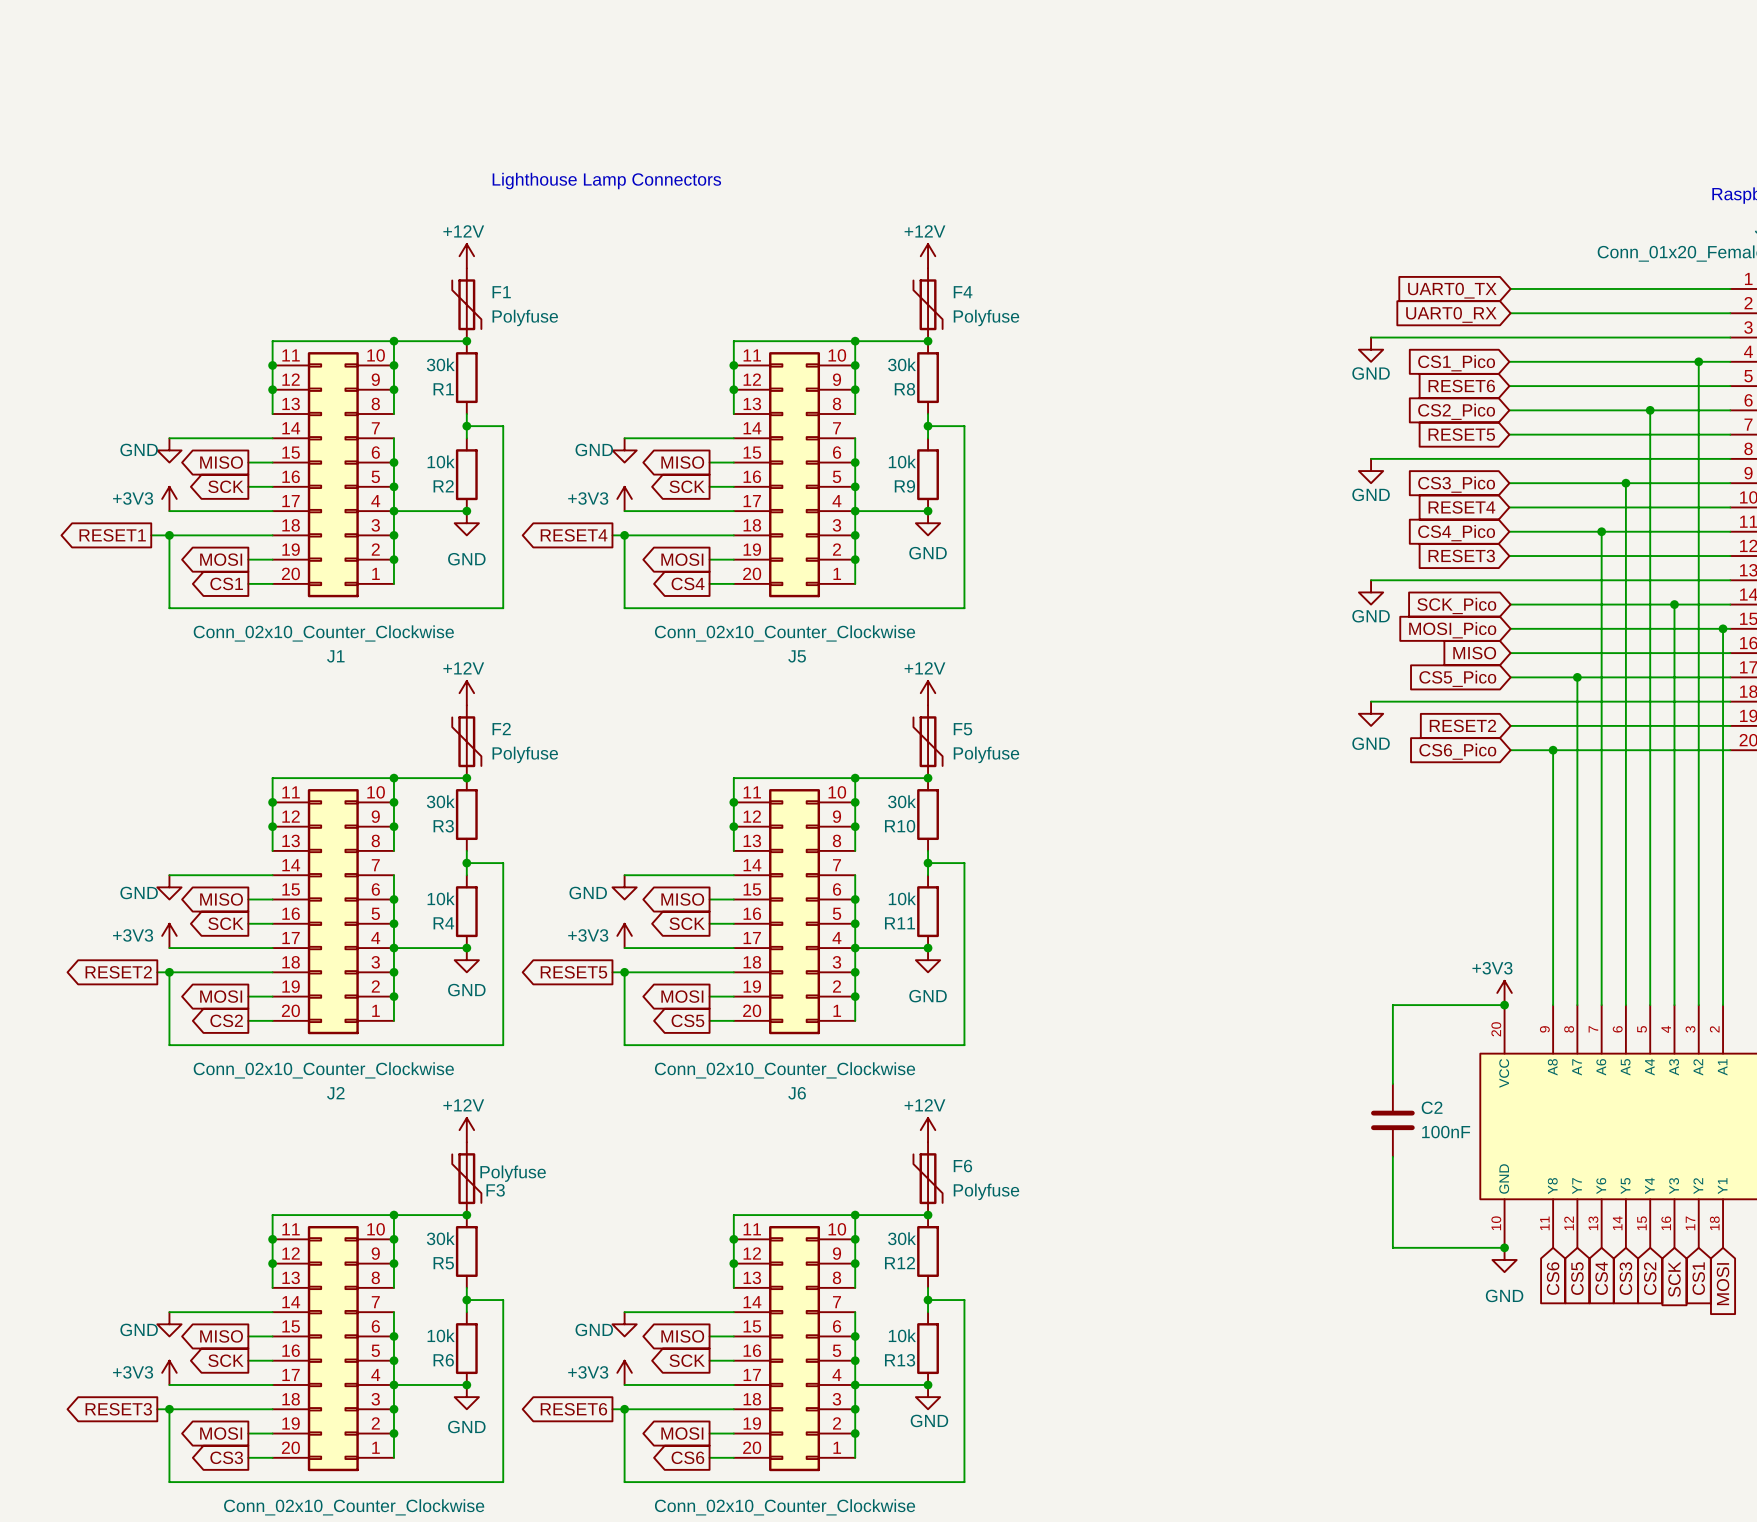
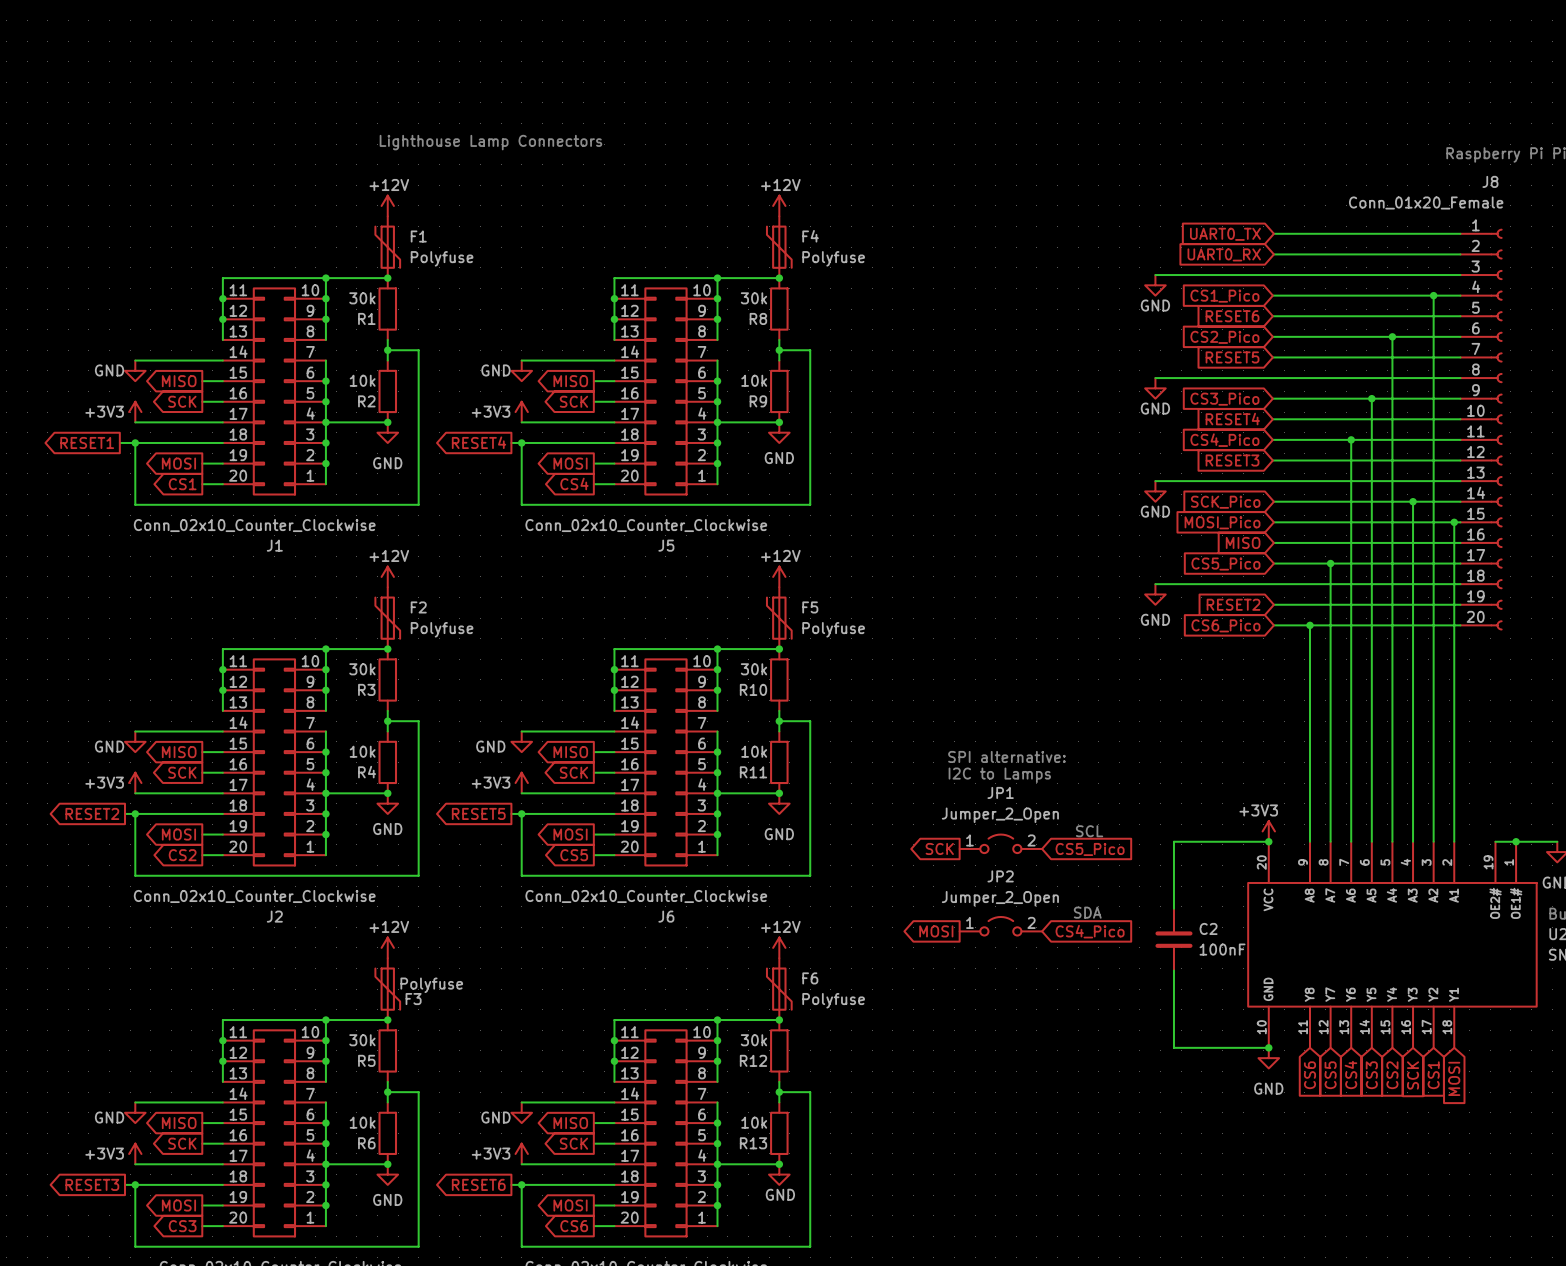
text: none -> SPI alternative: (1006, 756)
text: none -> I2C to Lamps (999, 775)
text: none -> SCL (1089, 831)
JP1: none -> Jumper_2_Open (1000, 843)
global label: none -> SCK (939, 848)
global label: none -> CS5_Pico (1090, 849)
text: none -> SDA (1087, 912)
JP2: none -> Jumper_2_Open (1000, 926)
global label: none -> MOSI (936, 931)
global label: none -> CS4_Pico (1090, 931)

